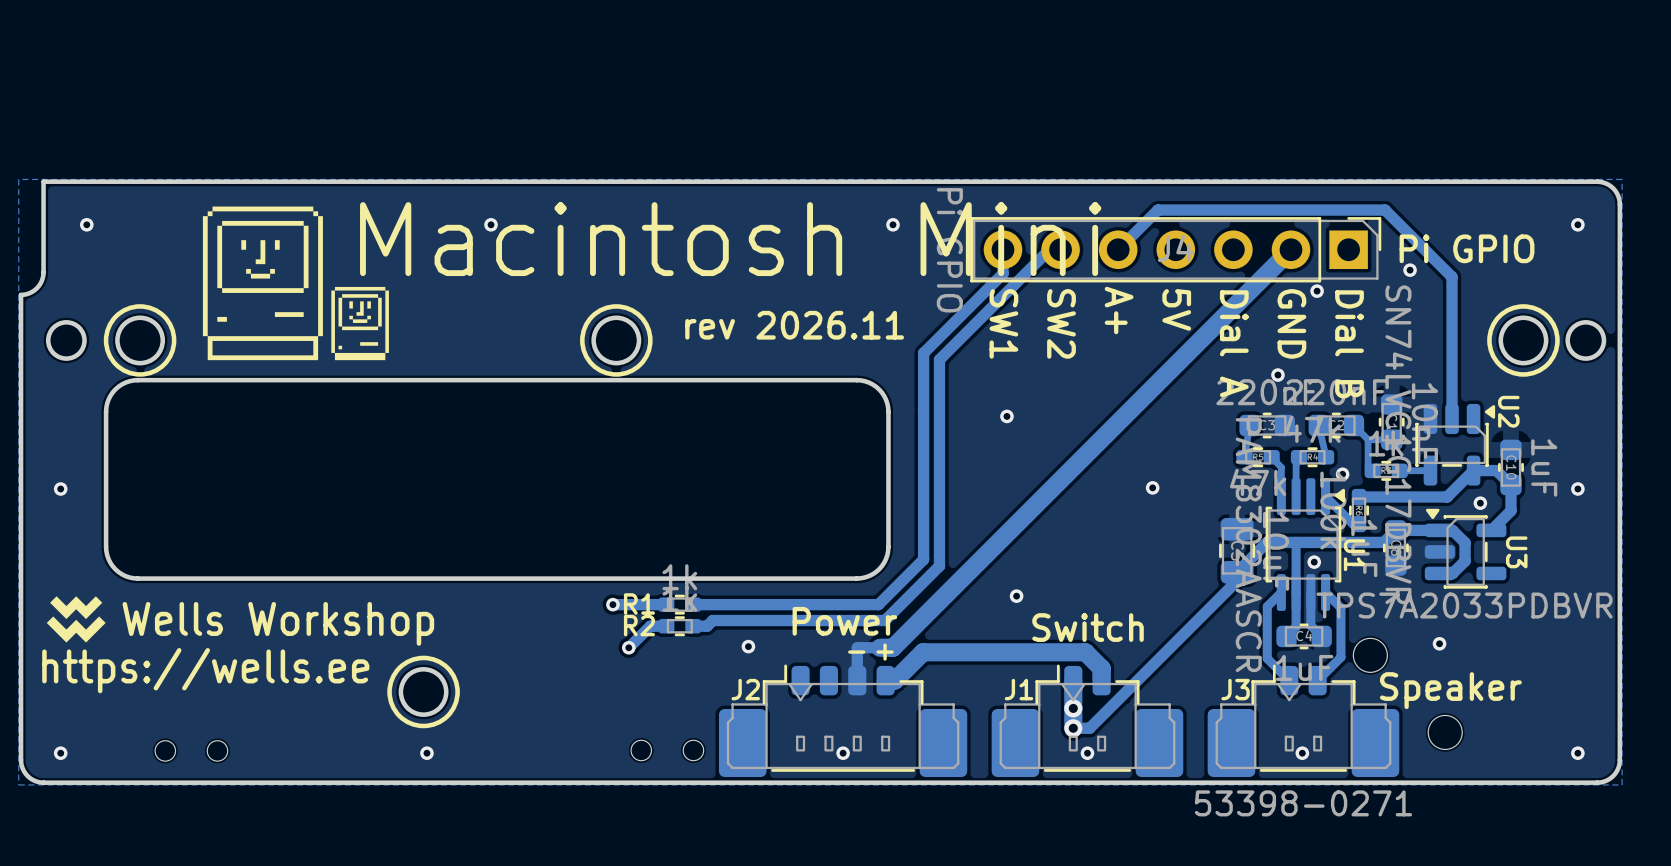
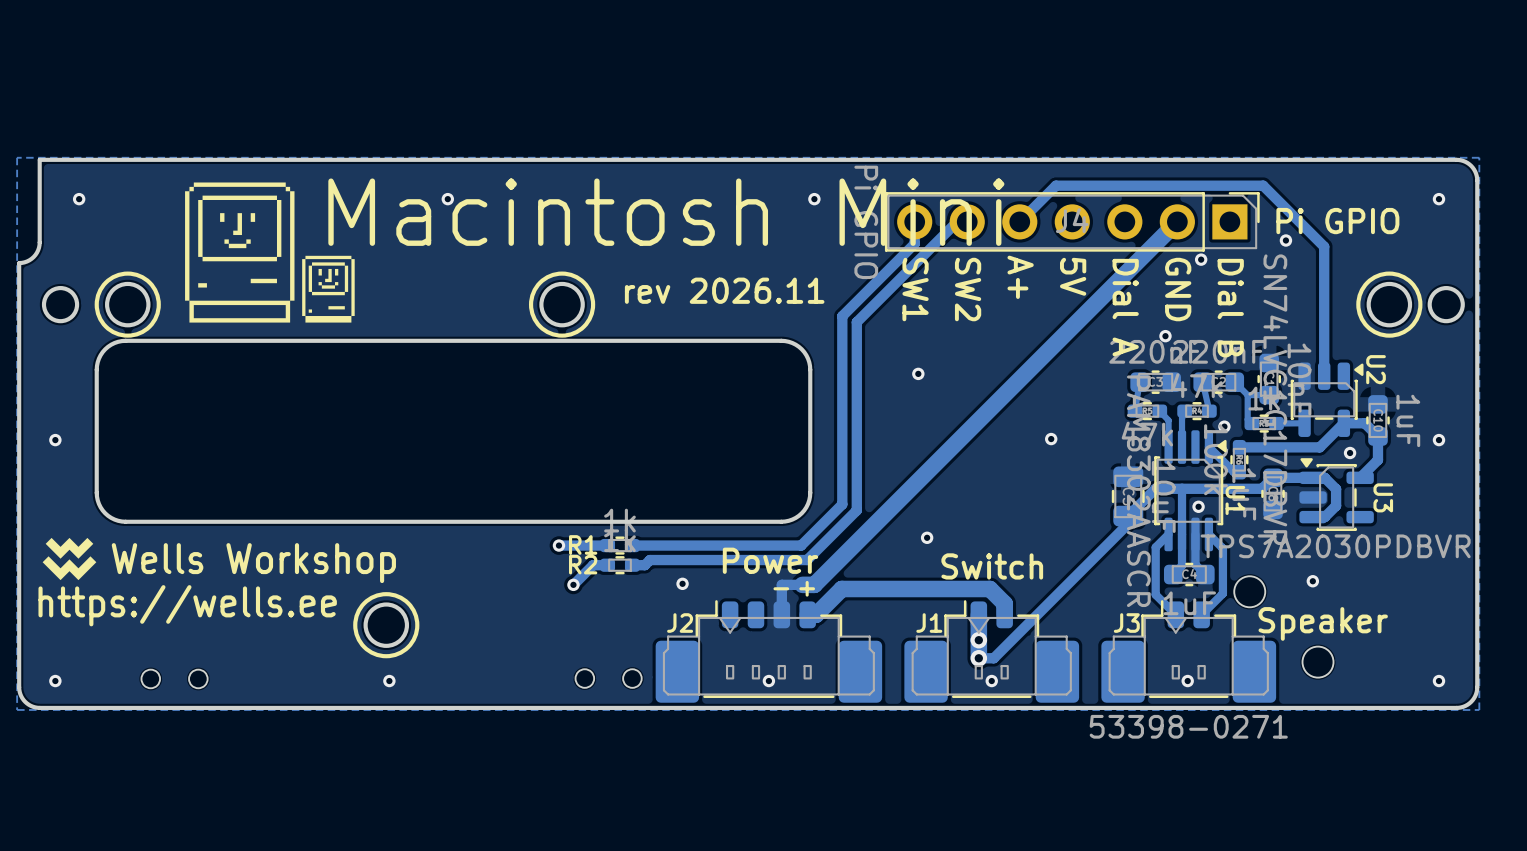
U3 value: TPS7A2033PDBVR (1464, 605) -> TPS7A2030PDBVR (1335, 546)

